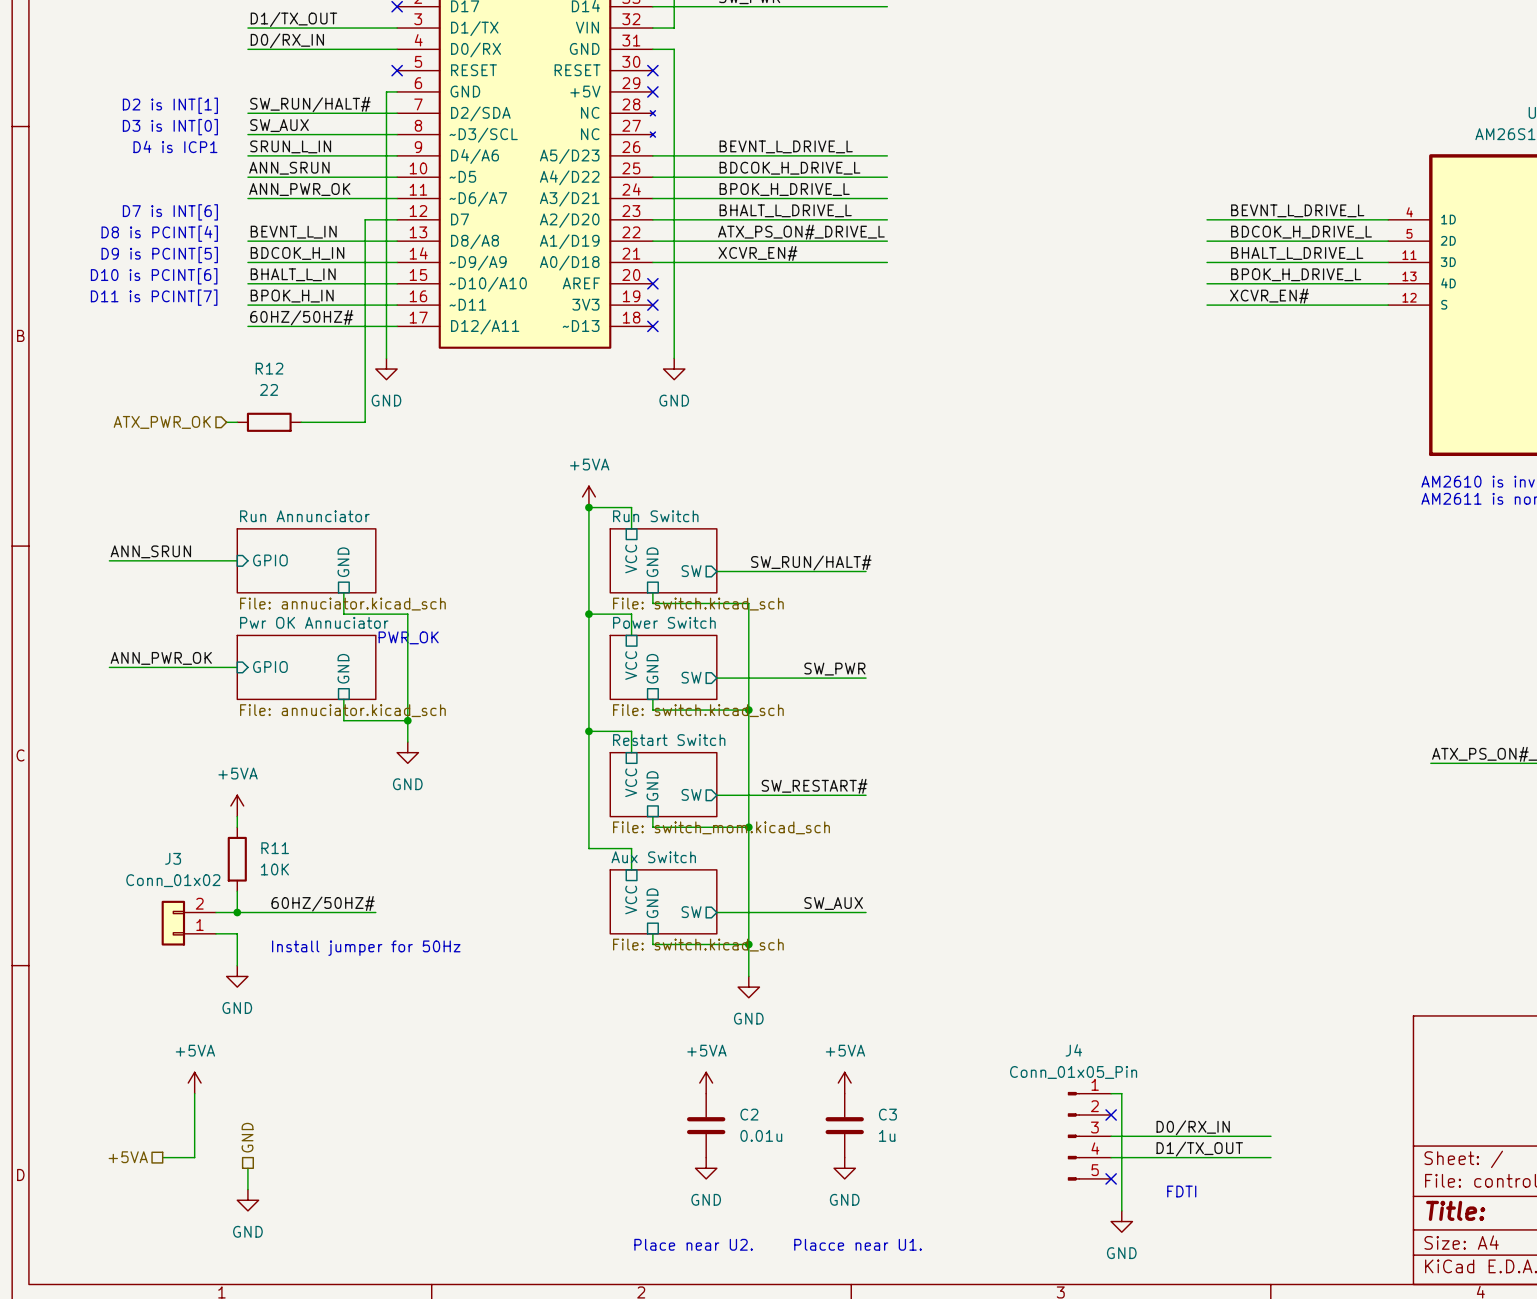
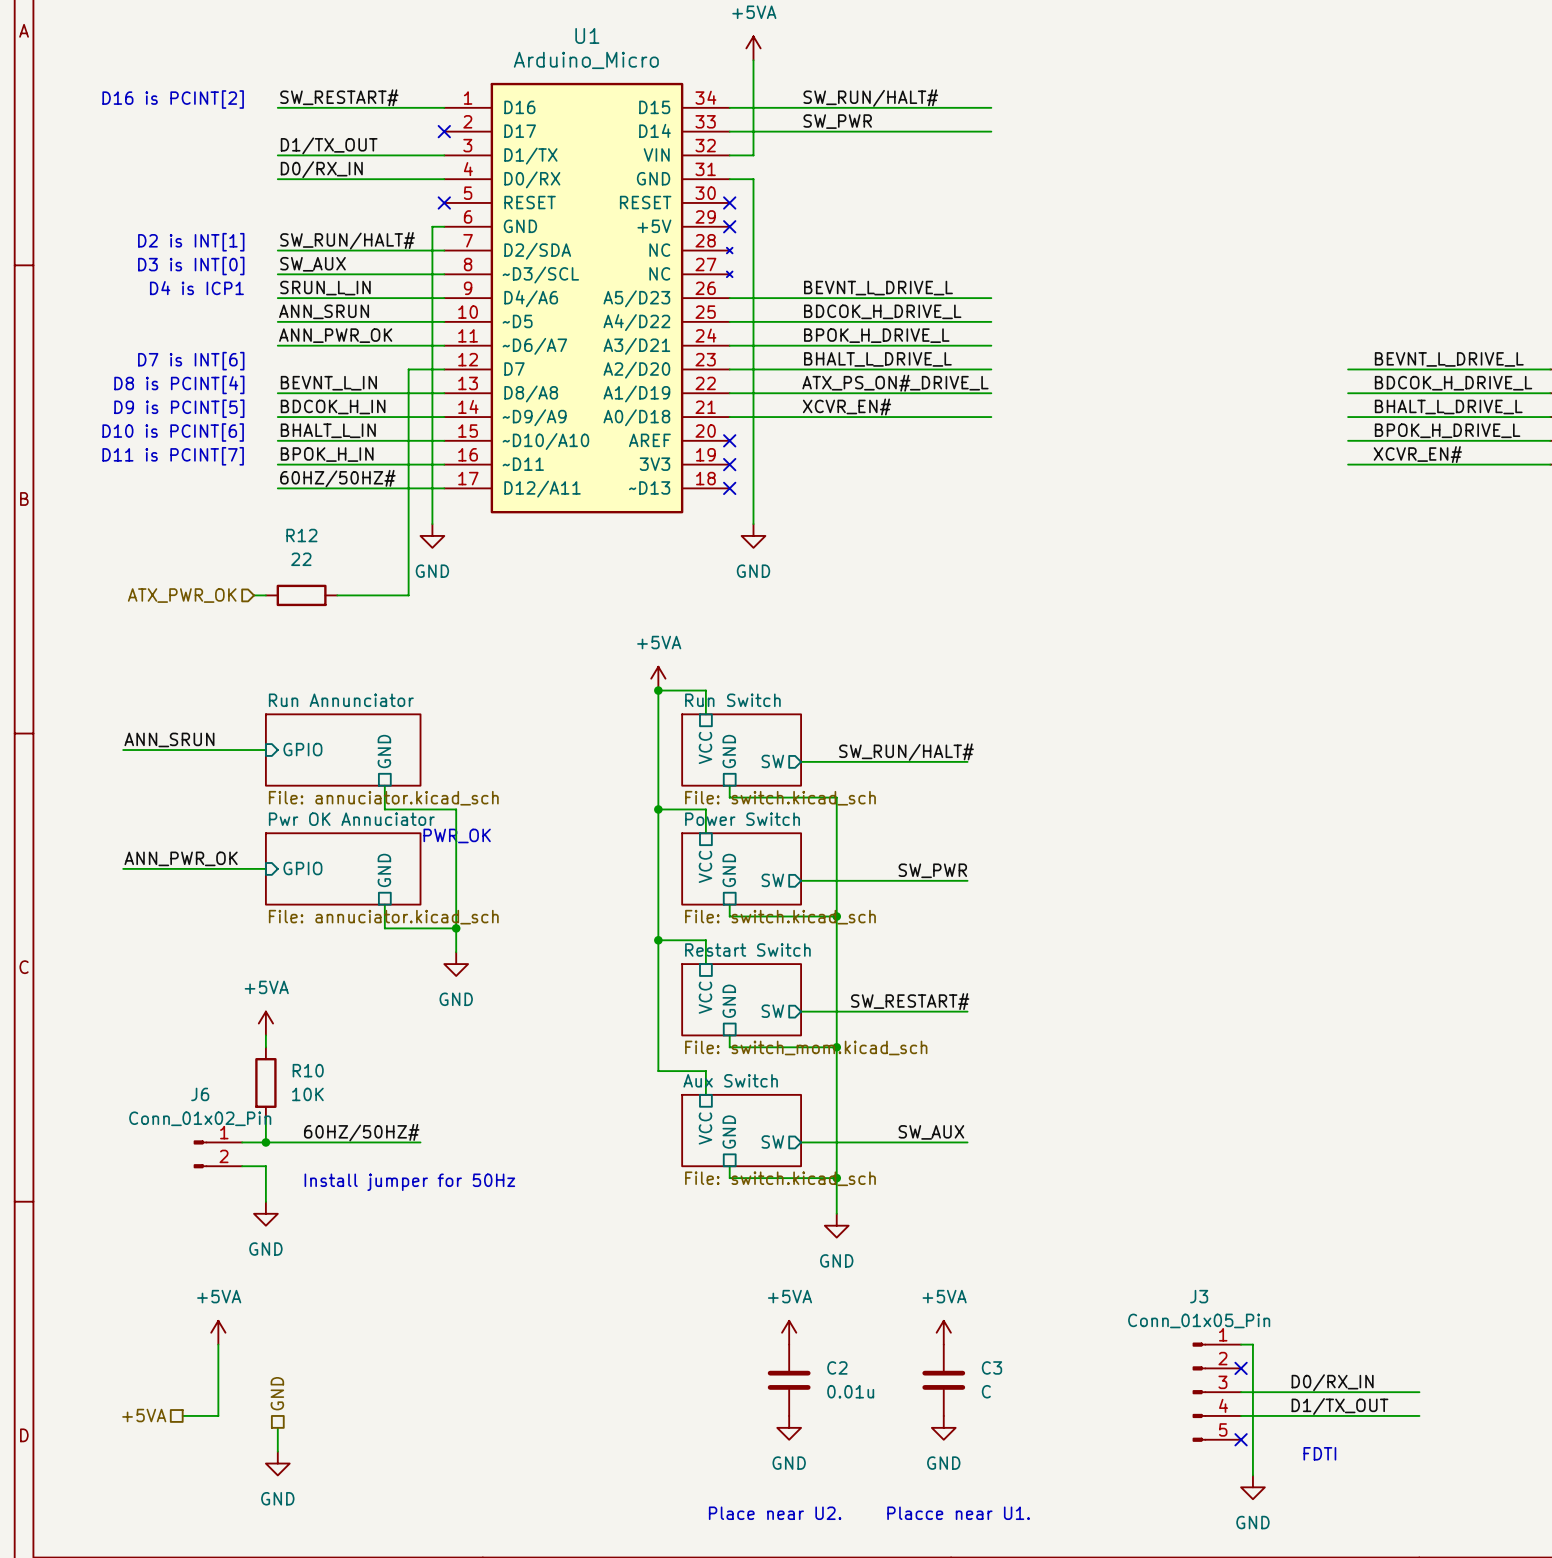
R11 name: R11 (275, 848) -> R10 (308, 1070)
J3: Conn_01x02 (188, 923) -> none
J6: none -> Conn_01x02_Pin (217, 1154)
J4 name: J4 (1073, 1050) -> J3 (1199, 1296)
C3 value: 1u (887, 1135) -> C (986, 1391)

